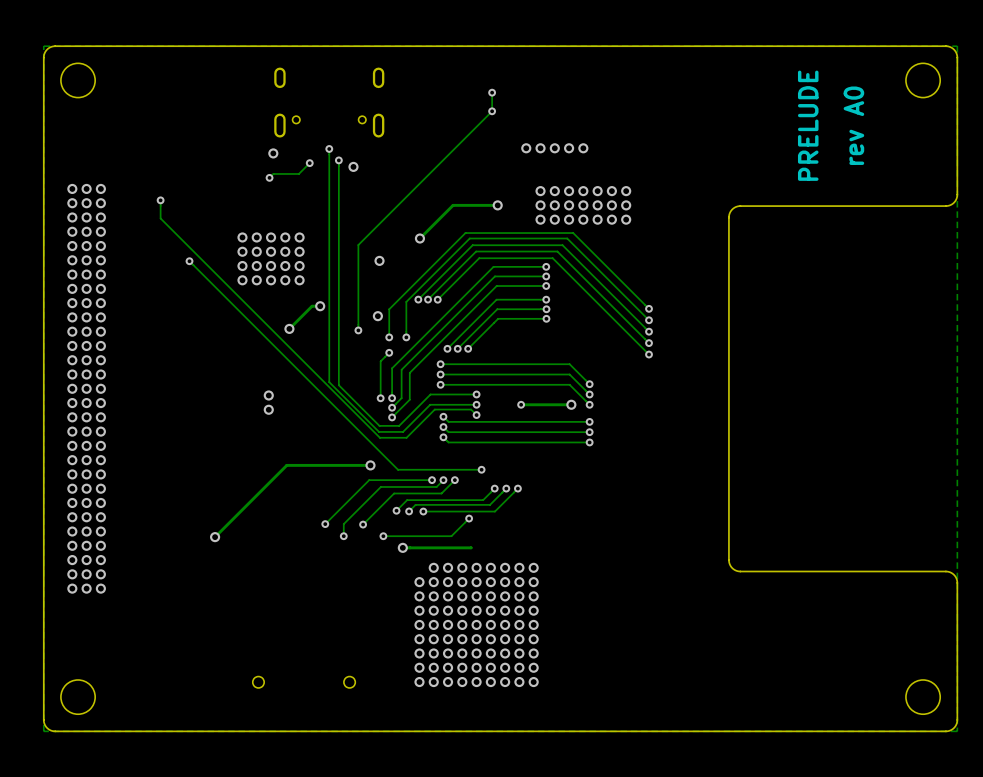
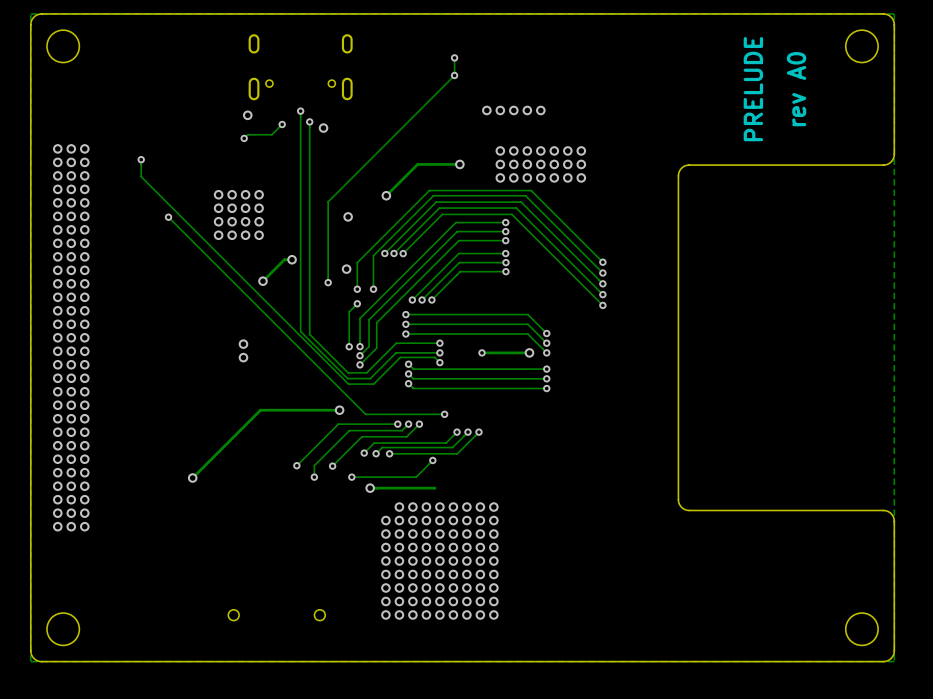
via: (299, 237) -> none
via: (299, 251) -> none
via: (299, 266) -> none
via: (299, 280) -> none

